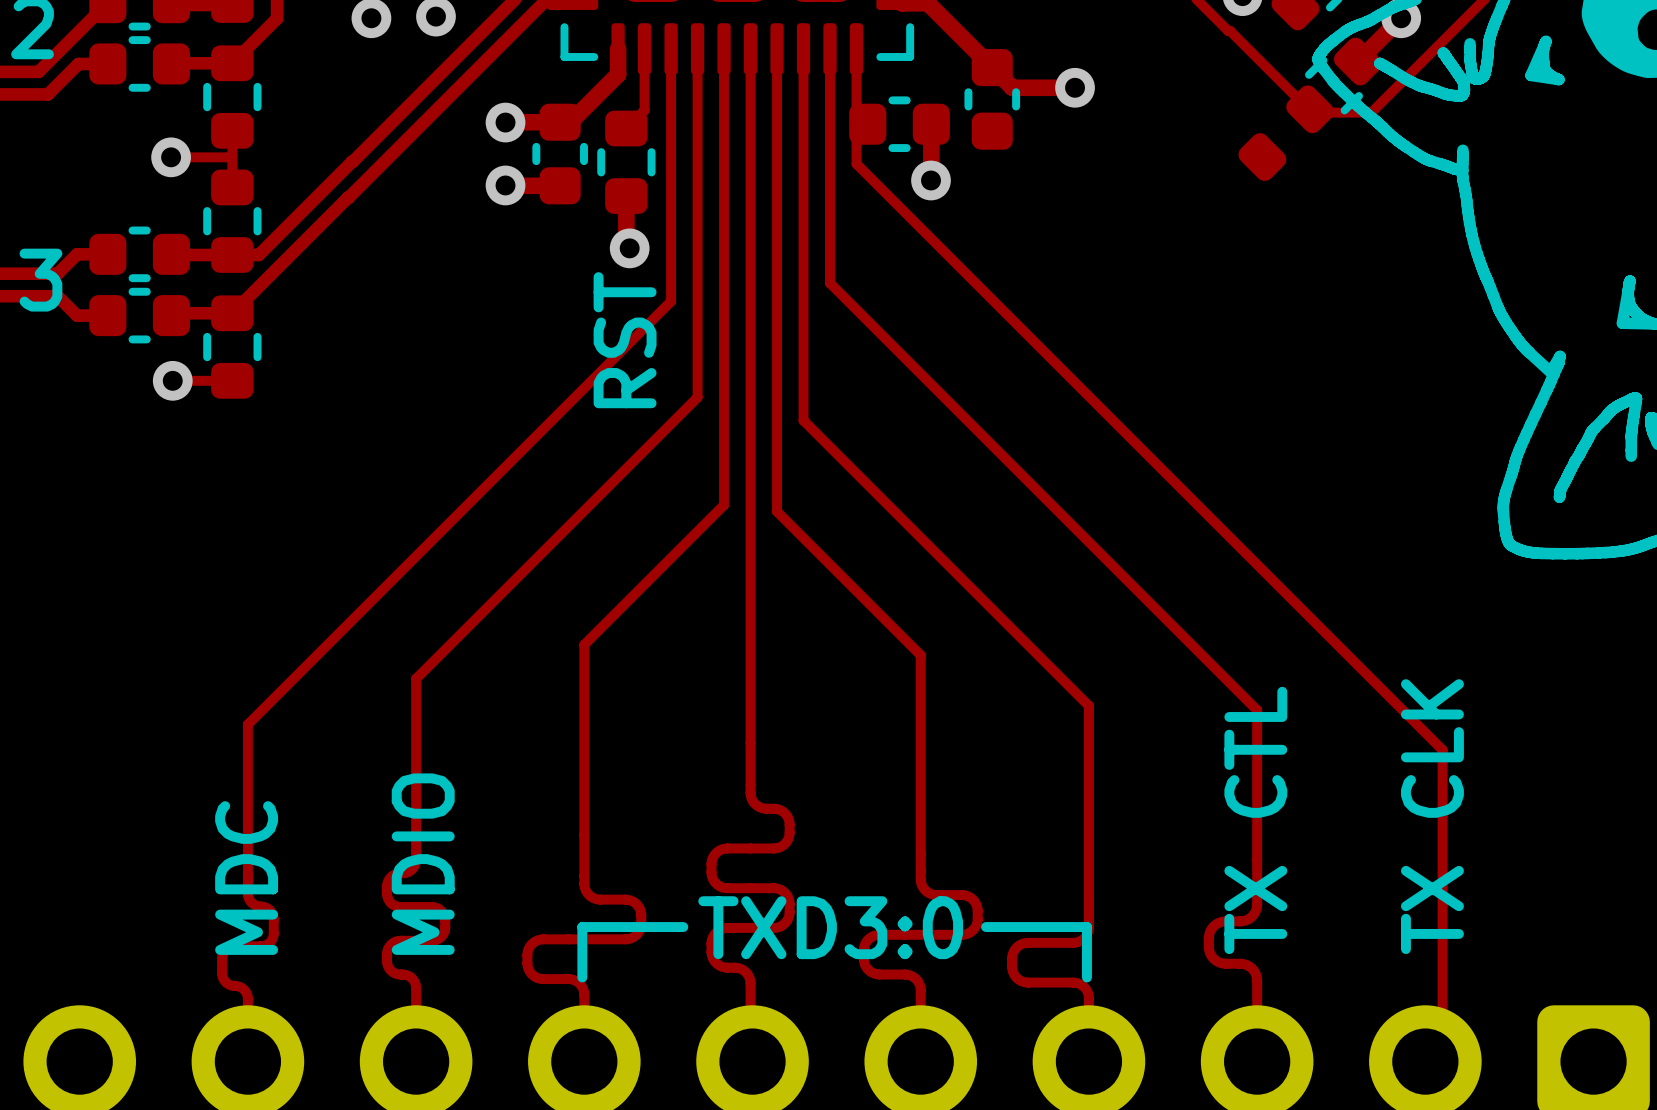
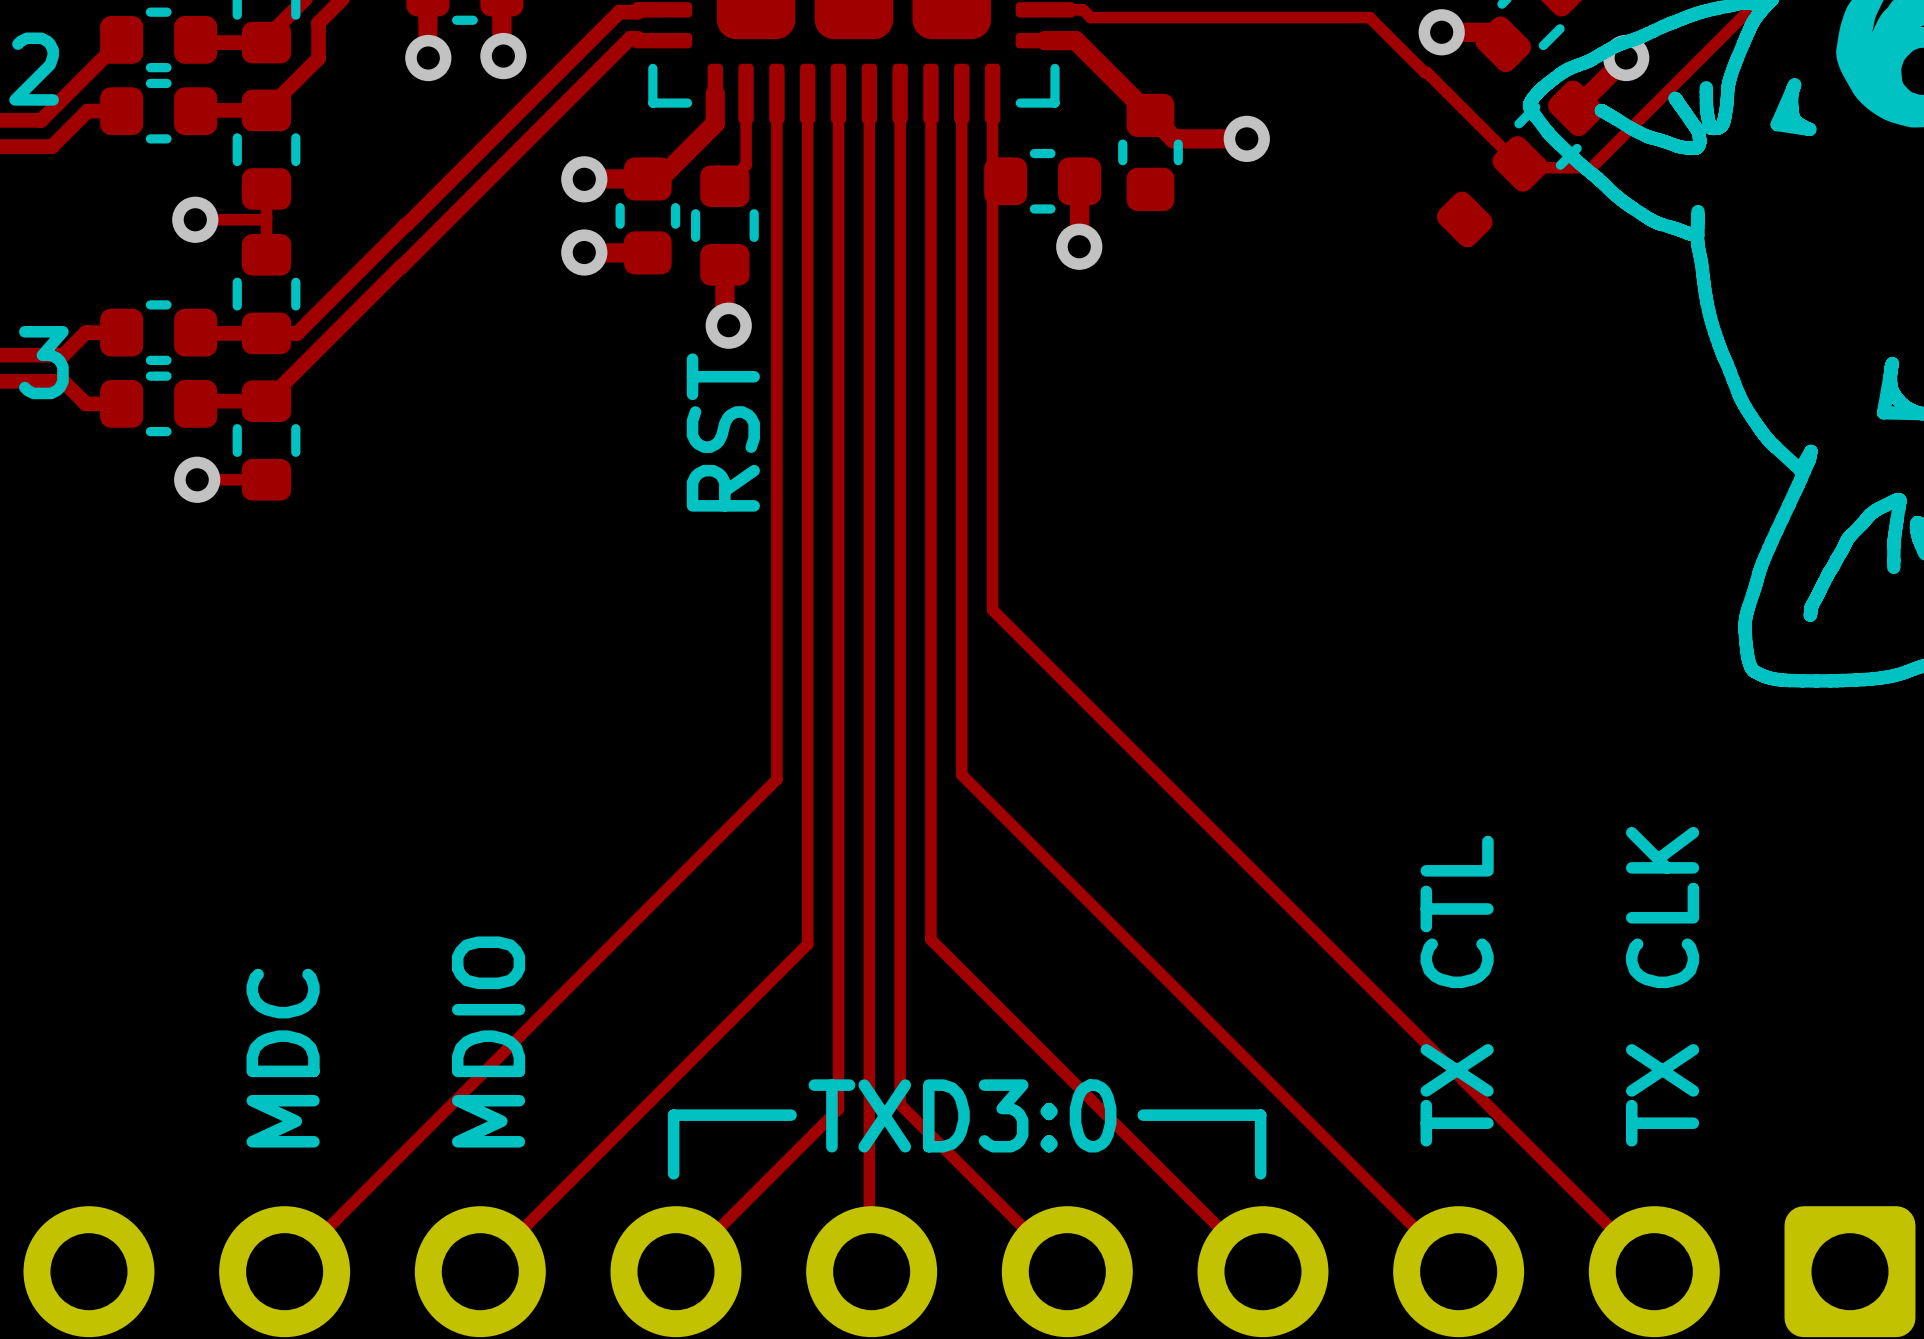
track: (856, 163) (1442, 750) (1442, 1044) (1425, 1061) -> (992, 227) (992, 609) (1654, 1271)
track: (830, 283) (1257, 710) (1256, 908) (1253, 914) (1246, 920) (1217, 923) (1211, 929) (1208, 938) (1209, 951) (1215, 960) (1223, 963) (1246, 965) (1255, 974) (1257, 1061) -> (961, 366) (961, 774) (1458, 1271)
track: (671, 301) (247, 724) (248, 895) (252, 903) (266, 907) (271, 912) (273, 934) (269, 942) (263, 945) (229, 947) (224, 952) (222, 959) (224, 979) (229, 984) (241, 987) (247, 996) (247, 1061) -> (776, 387) (776, 779) (284, 1271)
track: (697, 397) (416, 678) (416, 861) (409, 871) (392, 876) (386, 886) (387, 897) (393, 904) (398, 906) (434, 907) (441, 910) (445, 919) (444, 931) (438, 938) (433, 940) (397, 941) (390, 944) (387, 951) (387, 962) (389, 969) (396, 973) (409, 976) (415, 985) (416, 1061) -> (807, 499) (807, 944) (480, 1271)
track: (803, 420) (1088, 705) (1088, 932) (1084, 938) (1076, 942) (1022, 943) (1014, 950) (1012, 958) (1013, 973) (1022, 981) (1074, 982) (1085, 988) (1088, 998) (1088, 1061) -> (930, 525) (930, 939) (1262, 1271)
track: (724, 504) (584, 644) (584, 887) (588, 894) (594, 898) (632, 901) (638, 907) (641, 915) (639, 930) (630, 938) (541, 939) (533, 942) (528, 949) (527, 966) (534, 976) (541, 978) (571, 979) (578, 982) (582, 988) (584, 1061) -> (838, 624) (838, 1109) (675, 1271)
track: (777, 511) (920, 655) (921, 882) (924, 889) (931, 894) (963, 895) (970, 897) (977, 907) (977, 922) (971, 931) (963, 934) (876, 935) (867, 940) (863, 950) (864, 963) (871, 972) (877, 974) (908, 974) (914, 977) (919, 983) (920, 1061) -> (900, 631) (900, 1104) (1067, 1271)
track: (750, 792) (752, 799) (756, 805) (762, 808) (782, 811) (788, 817) (789, 824) (788, 837) (780, 846) (723, 848) (716, 853) (711, 860) (712, 877) (720, 886) (777, 888) (784, 892) (788, 898) (788, 917) (780, 926) (725, 928) (718, 930) (713, 936) (711, 953) (714, 961) (722, 966) (743, 970) (748, 975) (750, 983) -> (869, 959) (869, 1180)

